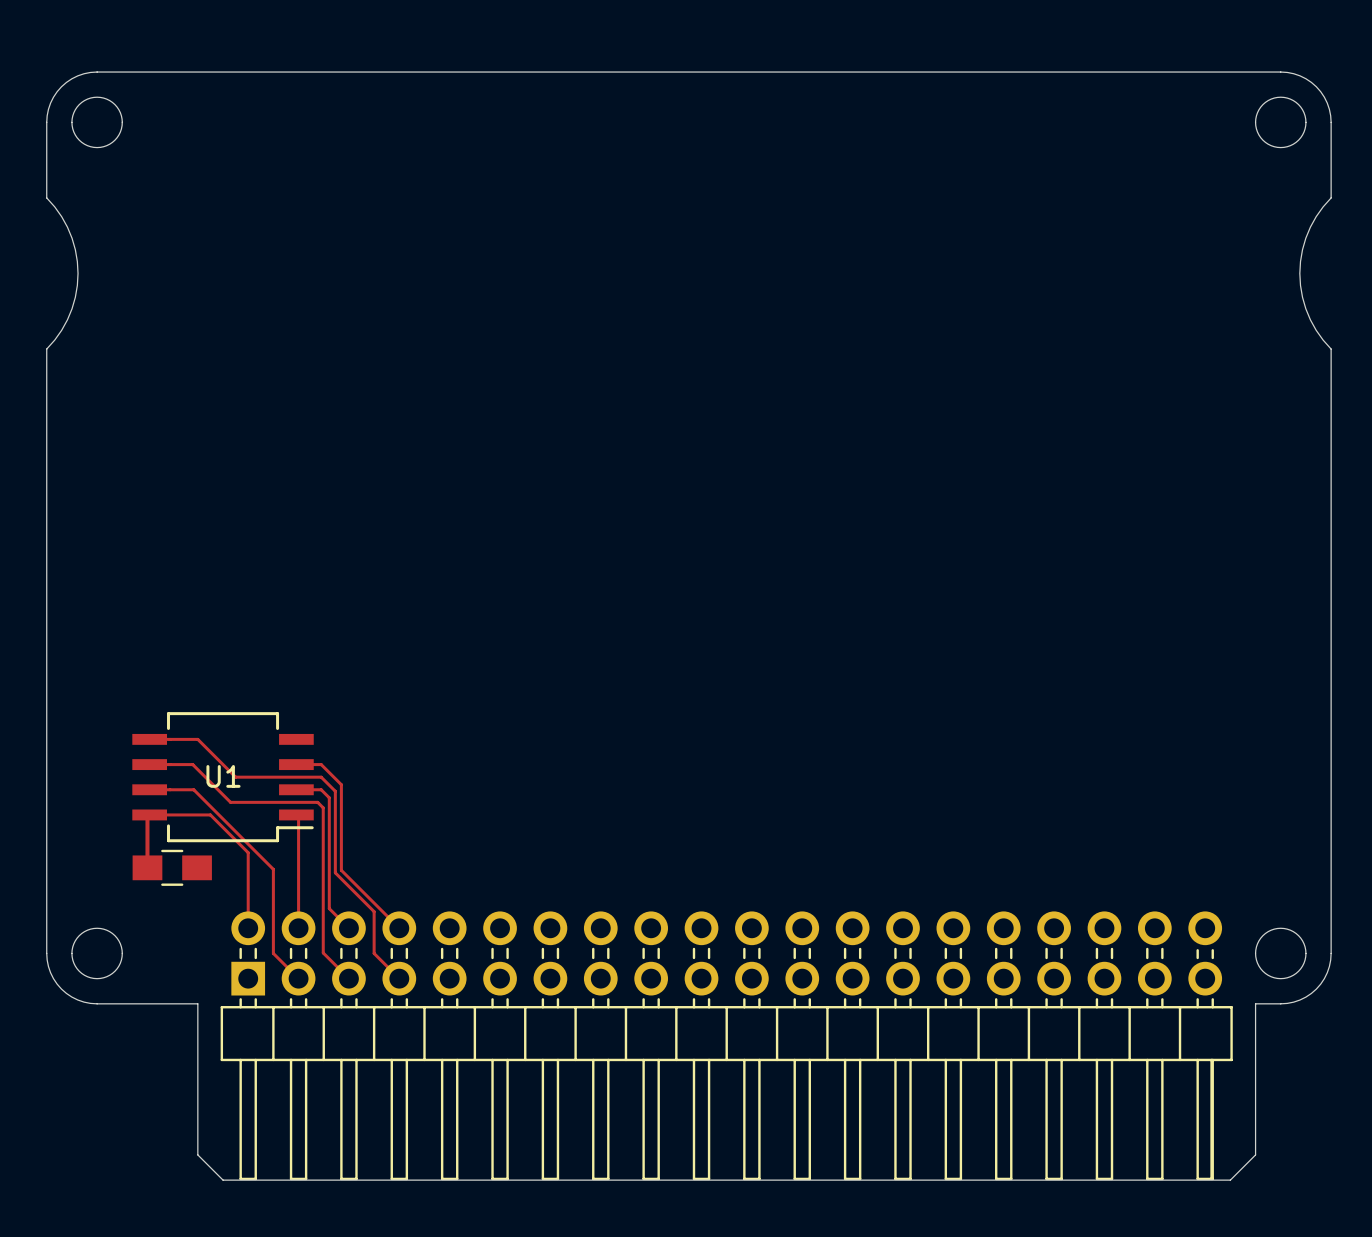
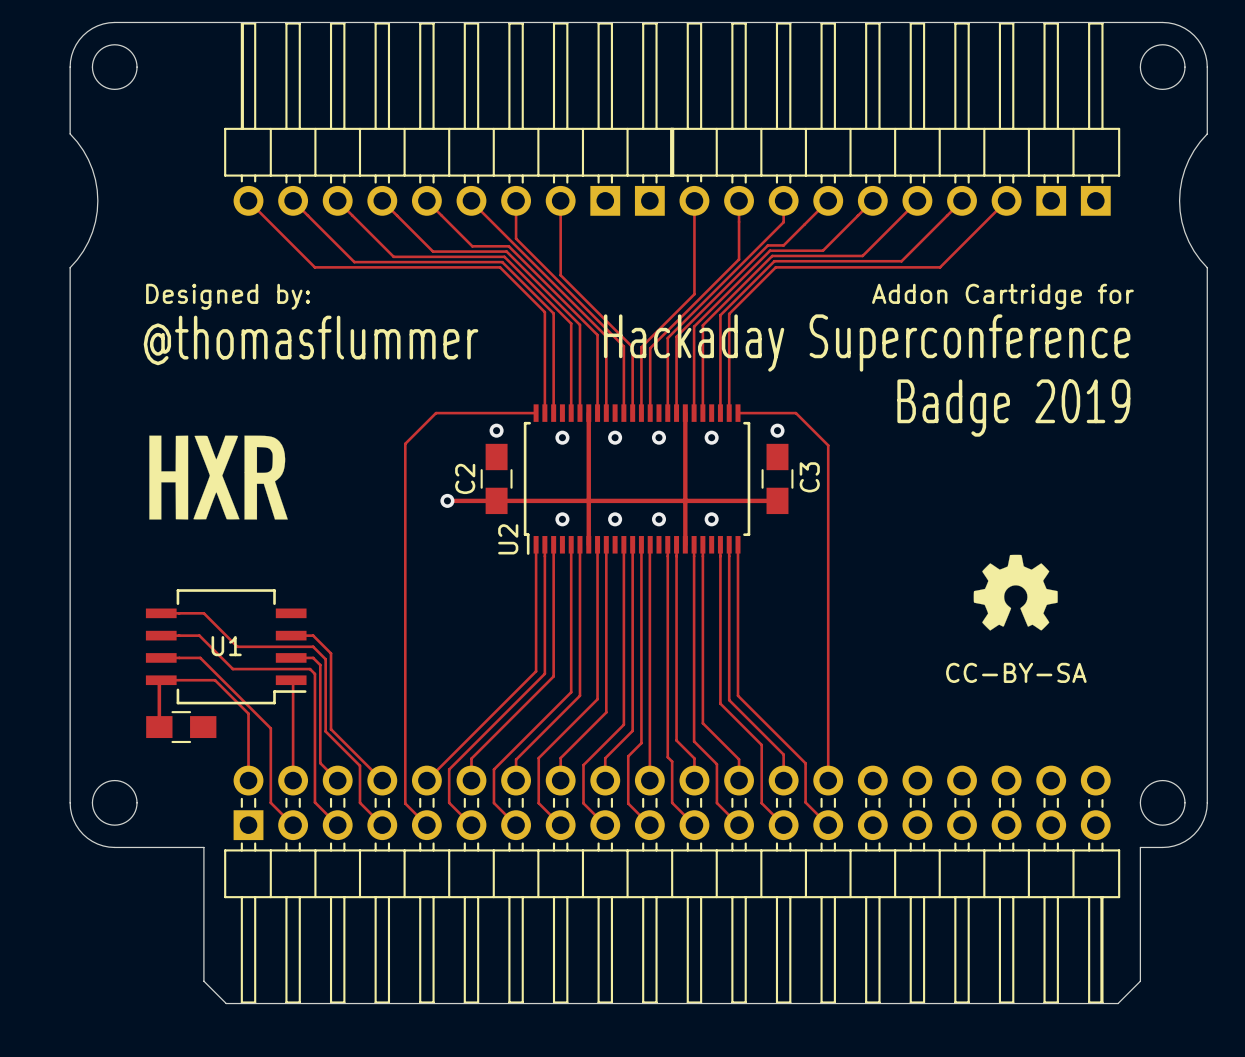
part: none -> (449, 119)
part: none -> (895, 119)
track: none -> (248, 201) (314, 267) (500, 267) (544, 312) (544, 413)
track: none -> (293, 200) (354, 262) (502, 262) (553, 313) (553, 413)
track: none -> (337, 200) (393, 256) (504, 256) (571, 323) (571, 413)
track: none -> (382, 200) (433, 251) (506, 251) (579, 324) (579, 413)
track: none -> (426, 200) (472, 246) (508, 246) (597, 335) (597, 413)
track: none -> (471, 200) (606, 336) (606, 413)
track: none -> (516, 200) (516, 238) (623, 346) (623, 413)
track: none -> (560, 200) (560, 275) (632, 347) (632, 413)
track: none -> (694, 200) (694, 294) (641, 347) (641, 413)
track: none -> (739, 200) (739, 259) (650, 348) (650, 413)
track: none -> (783, 200) (783, 222) (667, 338) (667, 413)
track: none -> (828, 200) (783, 245) (767, 245) (676, 336) (676, 413)
track: none -> (872, 200) (822, 250) (770, 250) (694, 326) (694, 413)
track: none -> (917, 201) (862, 255) (772, 255) (702, 325) (702, 413)
track: none -> (962, 200) (901, 261) (774, 261) (720, 315) (720, 413)
track: none -> (1006, 200) (940, 267) (775, 267) (729, 313) (729, 413)
text: none -> Designed by: (228, 296)
text: none -> Addon Cartridge for (1002, 296)
text: none -> @thomasflummer (311, 340)
text: none -> Hackaday Superconference (867, 343)
text: none -> Badge 2019 (1013, 408)
track: none -> (536, 413) (436, 413) (405, 443) (405, 803) (426, 825)
track: none -> (588, 413) (588, 544)
track: none -> (685, 413) (685, 544)
track: none -> (737, 413) (795, 413) (828, 445) (828, 780)
via: none -> (496, 430)
via: none -> (777, 430)
drawing: none -> [149, 435, 288, 520]
via: none -> (562, 437)
via: none -> (615, 437)
via: none -> (658, 437)
via: none -> (711, 437)
C2: none -> (496, 478)
C3: none -> (777, 478)
U2: none -> (637, 479)
track: none -> (447, 500) (777, 500)
via: none -> (447, 500)
via: none -> (562, 519)
via: none -> (615, 519)
via: none -> (658, 519)
via: none -> (711, 519)
track: none -> (536, 544) (536, 671) (426, 780)
track: none -> (544, 544) (544, 673) (449, 769) (449, 802) (471, 825)
track: none -> (553, 544) (553, 676) (471, 758) (471, 780)
track: none -> (571, 544) (571, 692) (493, 769) (493, 803) (516, 825)
track: none -> (579, 544) (579, 695) (516, 759) (516, 780)
track: none -> (597, 544) (597, 699) (538, 758) (538, 803) (560, 825)
track: none -> (606, 544) (606, 712) (560, 758) (560, 780)
track: none -> (623, 544) (623, 724) (583, 765) (583, 803) (605, 825)
track: none -> (632, 544) (632, 730) (605, 758) (605, 780)
track: none -> (641, 544) (641, 743) (628, 756) (628, 803) (649, 825)
track: none -> (650, 544) (649, 780)
track: none -> (667, 544) (667, 757) (672, 761) (672, 802) (694, 825)
track: none -> (676, 544) (676, 740) (694, 758) (694, 780)
track: none -> (694, 544) (694, 741) (716, 764) (716, 803) (739, 825)
track: none -> (702, 544) (702, 723) (739, 759) (739, 780)
track: none -> (720, 544) (720, 703) (761, 744) (761, 803) (783, 825)
track: none -> (729, 544) (729, 700) (783, 754) (783, 780)
track: none -> (737, 544) (737, 695) (805, 763) (805, 802) (828, 825)
drawing: none -> [973, 554, 1058, 631]
text: none -> CC-BY-SA (1016, 672)

